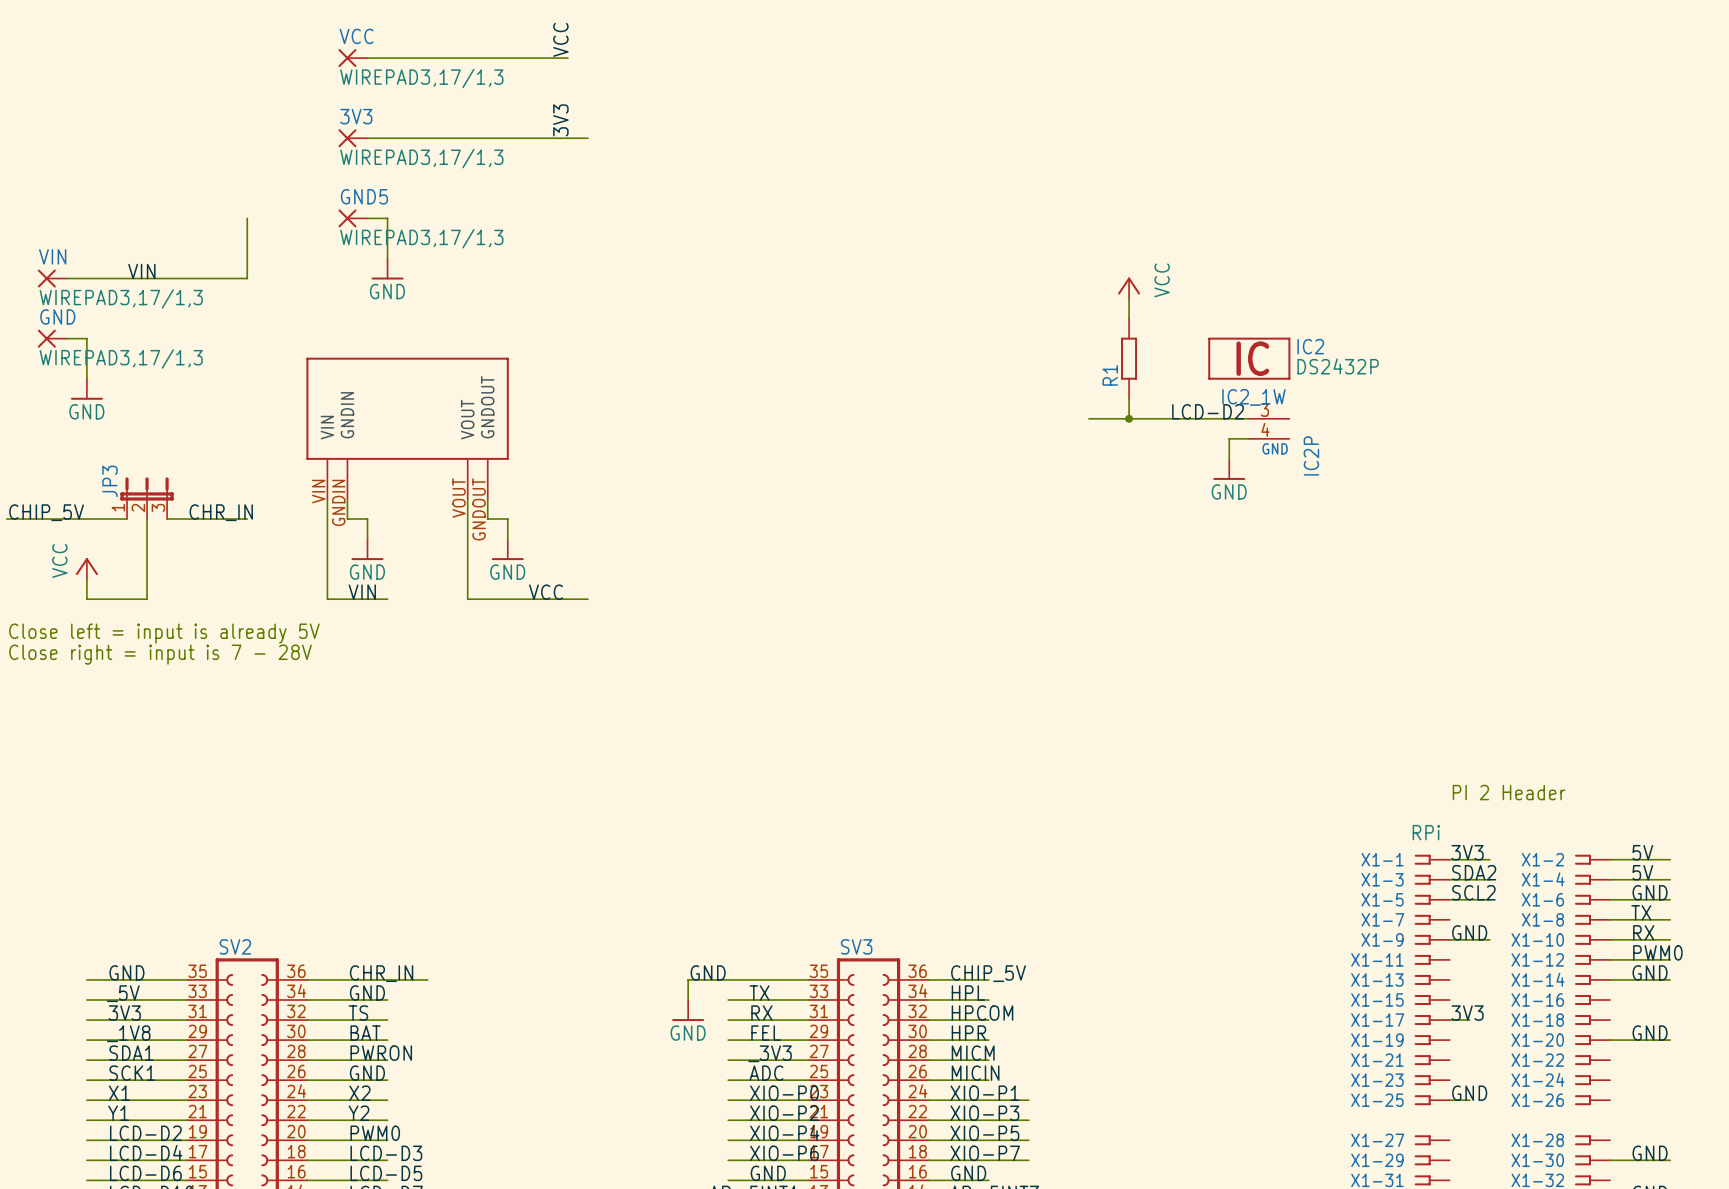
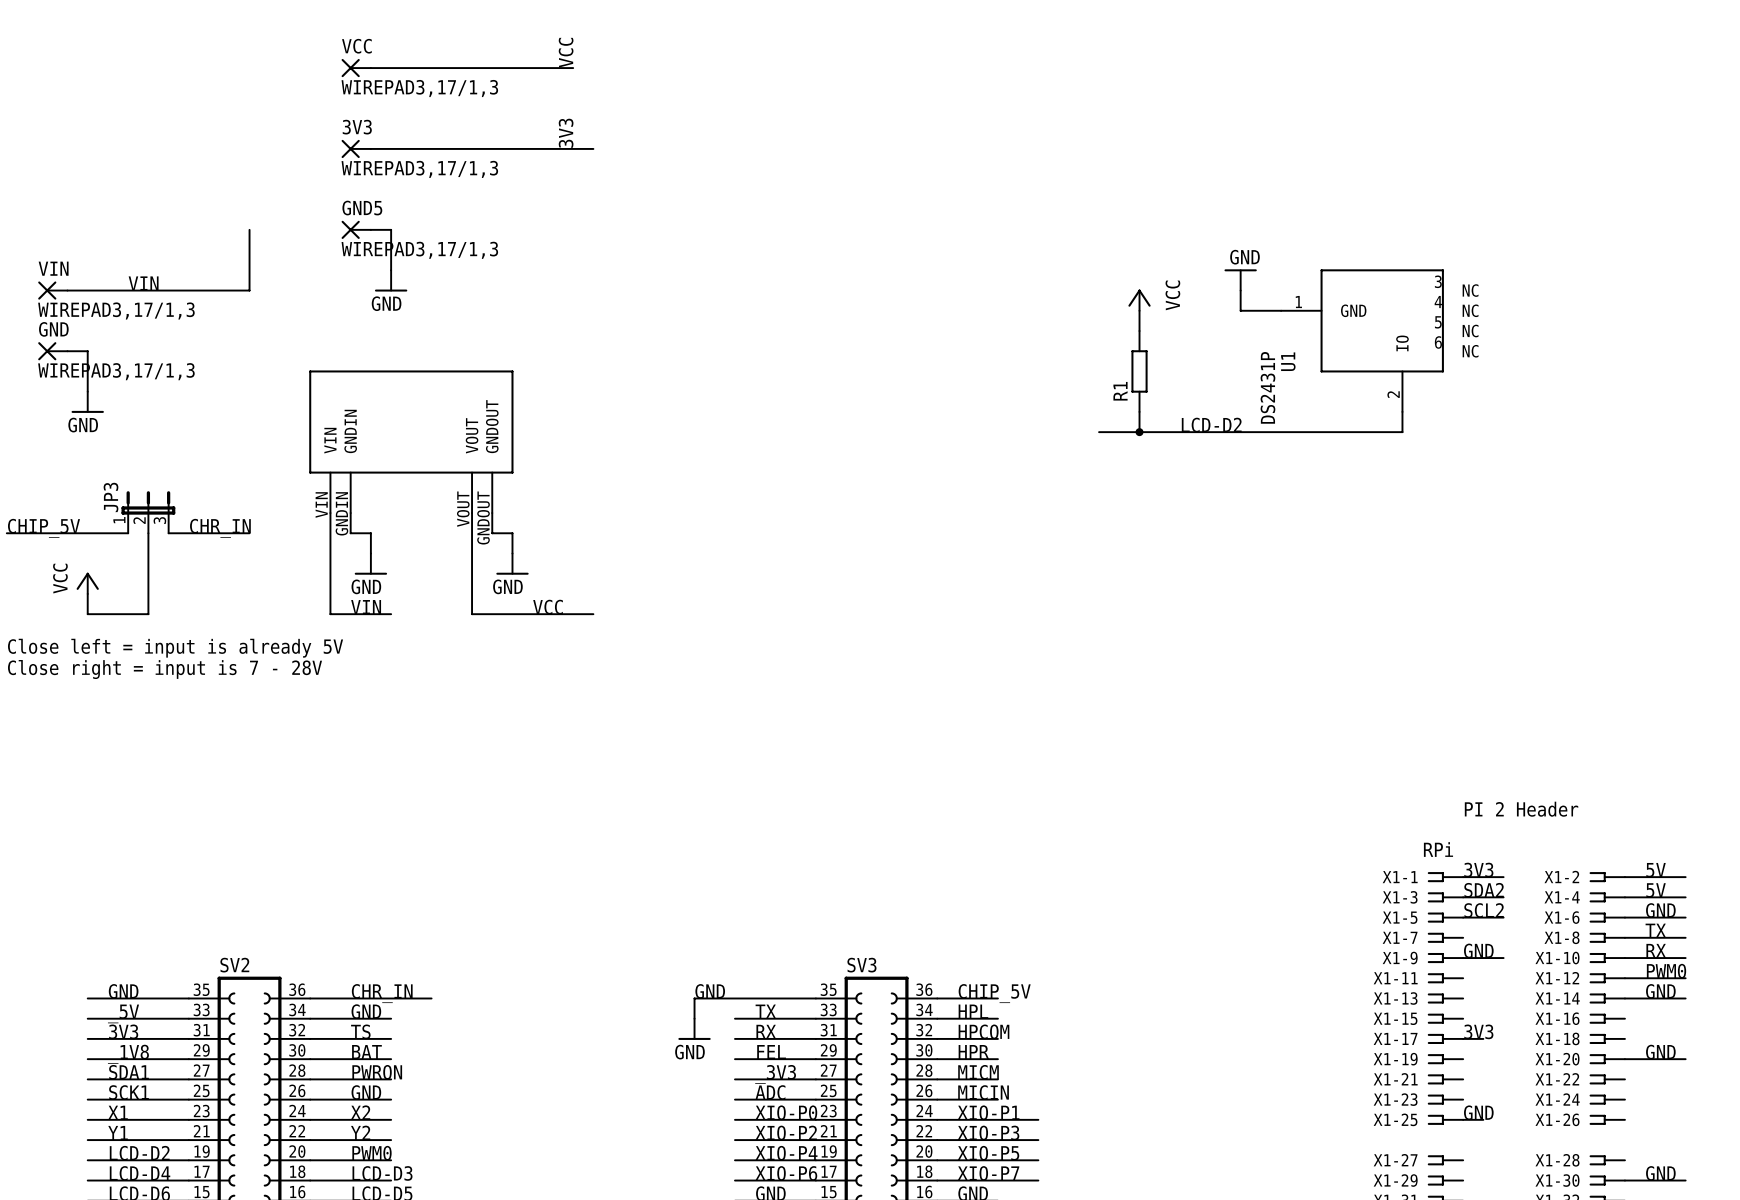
power symbol: none -> GND (1240, 279)
wire: none -> (1240, 290) (1240, 310) (1281, 310)
U1: none -> DS2431P (1362, 340)
IC2: DS2432P (1249, 358) -> none
wire: none -> (1402, 411) (1402, 432) (1260, 432)
IC2_1W: (1269, 418) -> none
wire: (1249, 438) (1229, 438) (1229, 458) -> none
IC2P: (1269, 438) -> none
power symbol: GND (1229, 469) -> none

